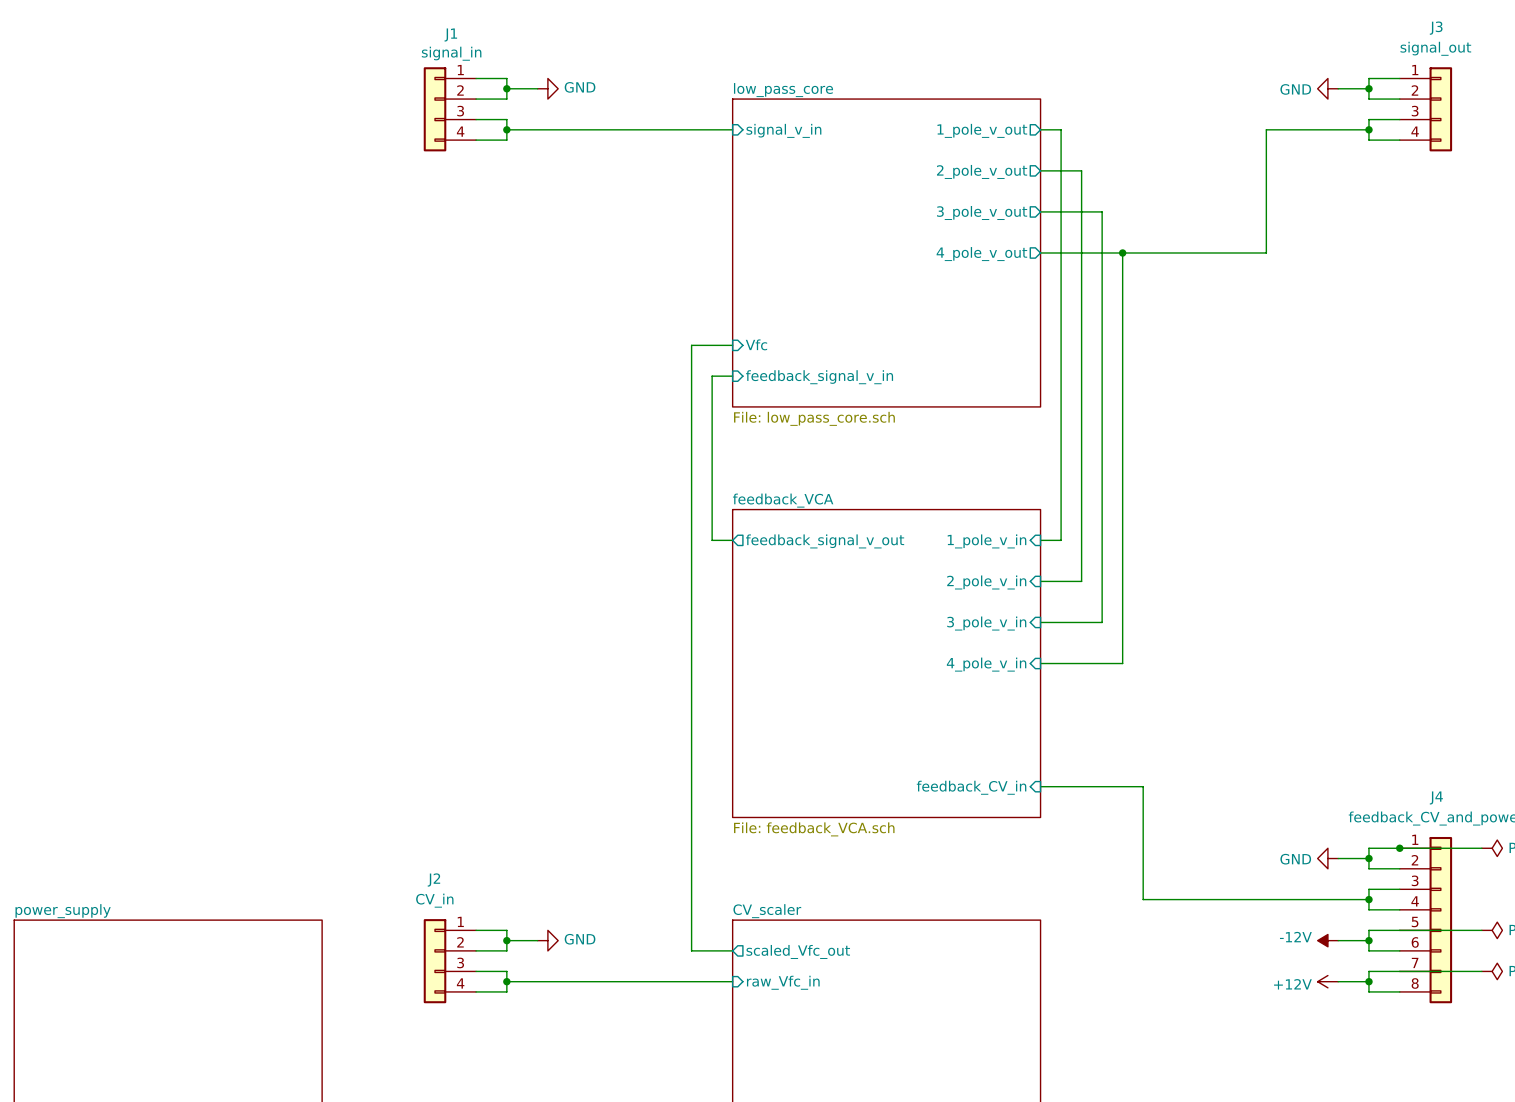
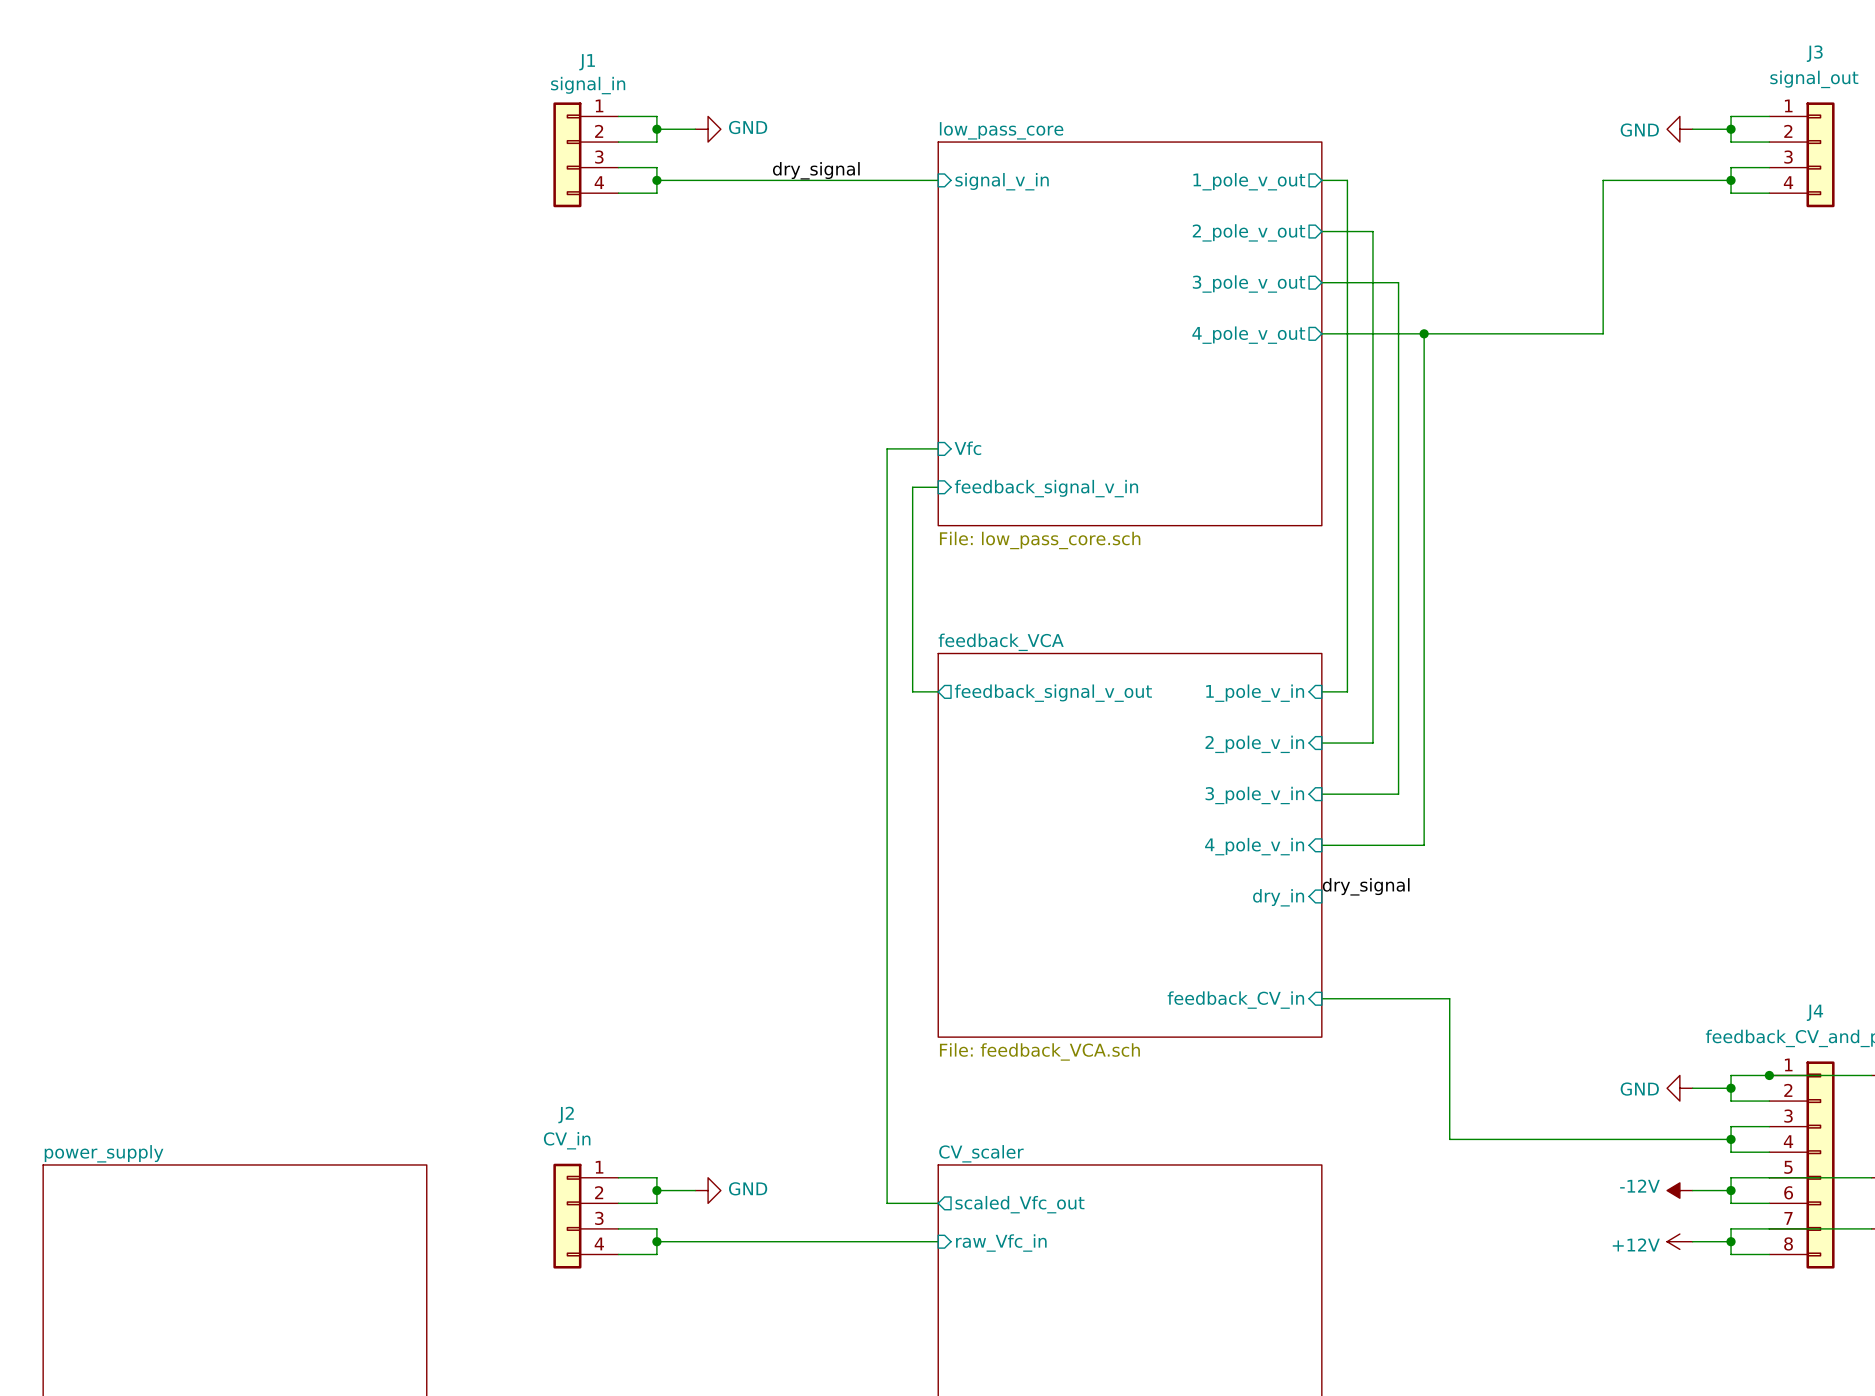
label: none -> dry_signal (816, 170)
label: none -> dry_signal (1366, 886)
sheet pin: none -> dry_in (1278, 897)

